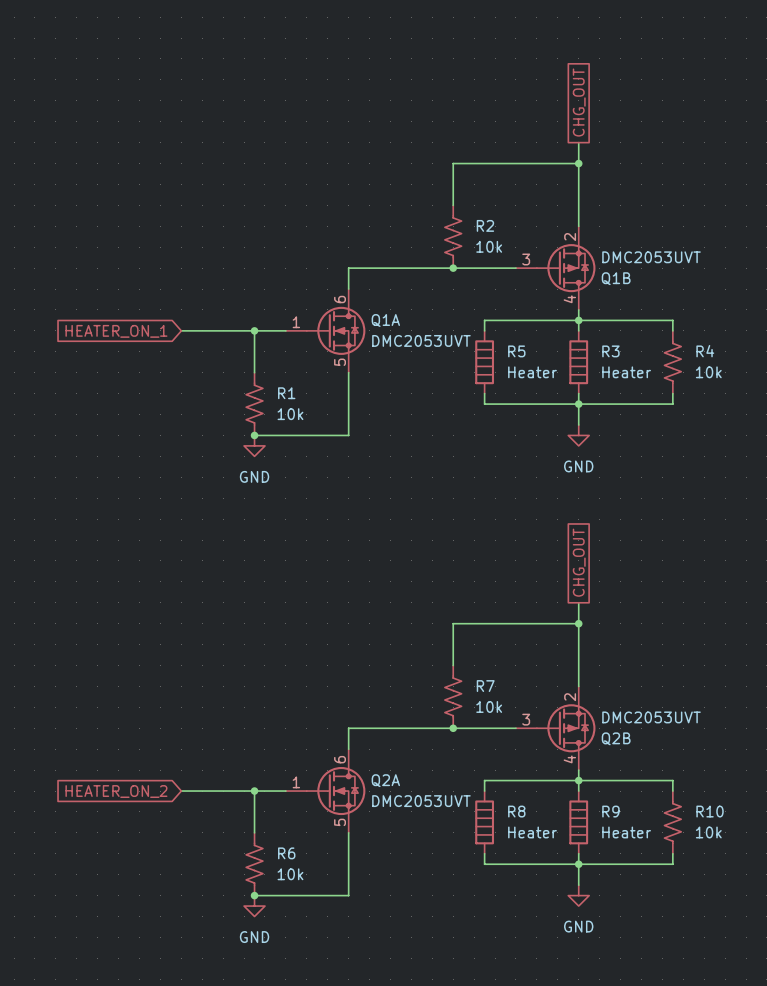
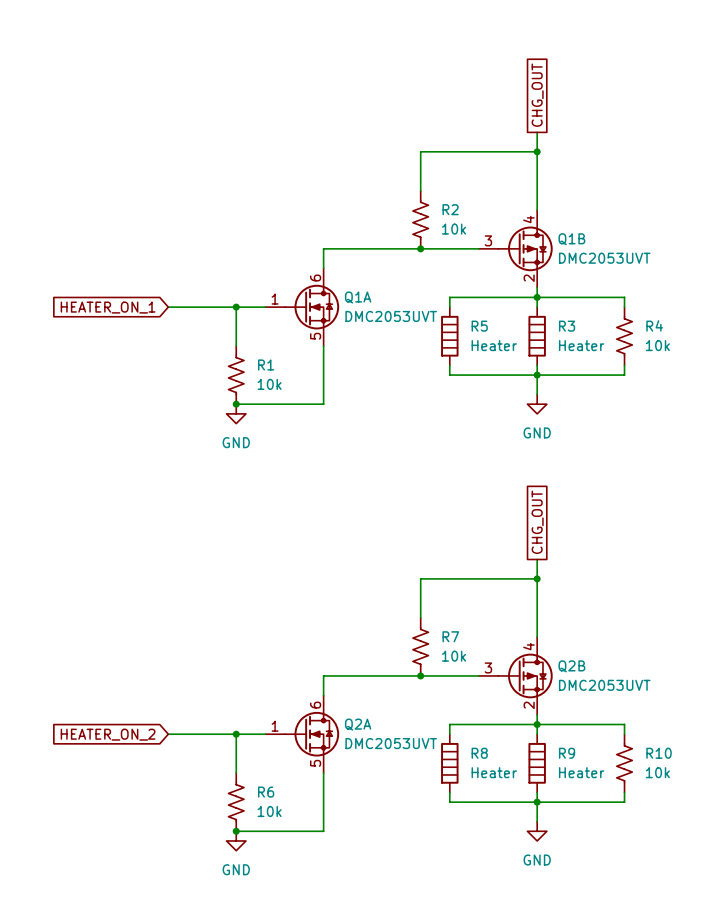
Q1B flip: as is (566, 268) -> up-down (525, 248)
Q2B flip: as is (566, 728) -> up-down (525, 675)

